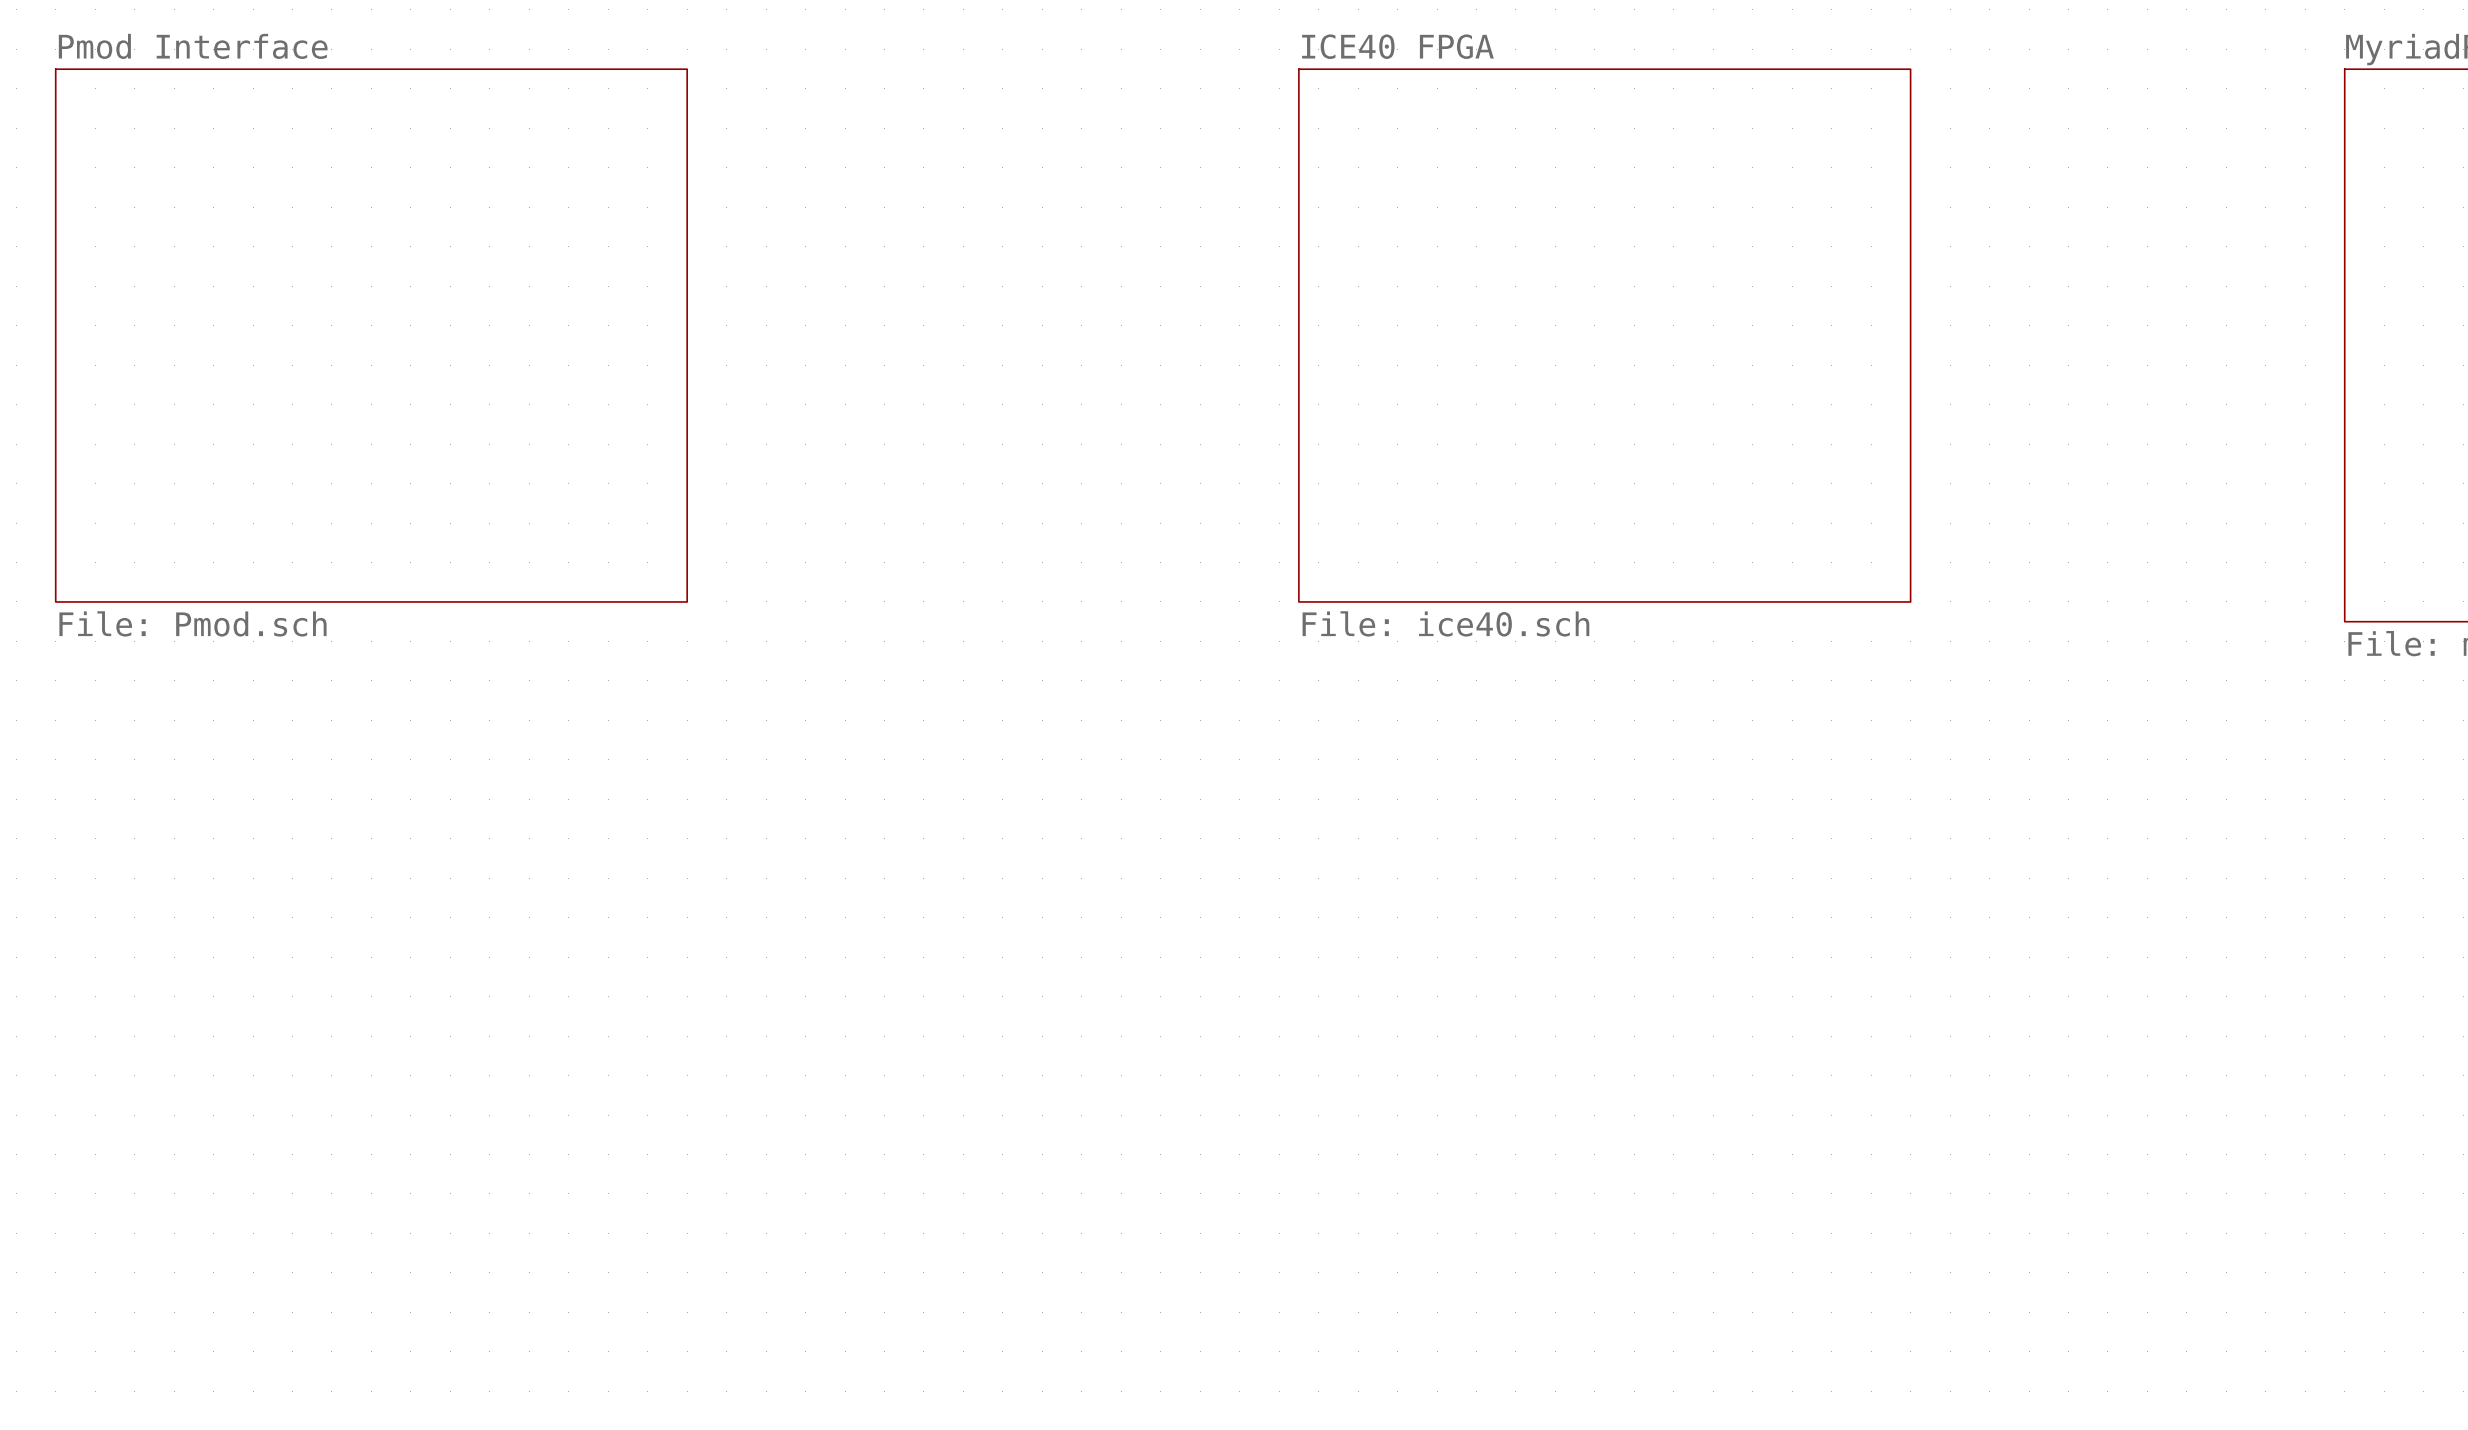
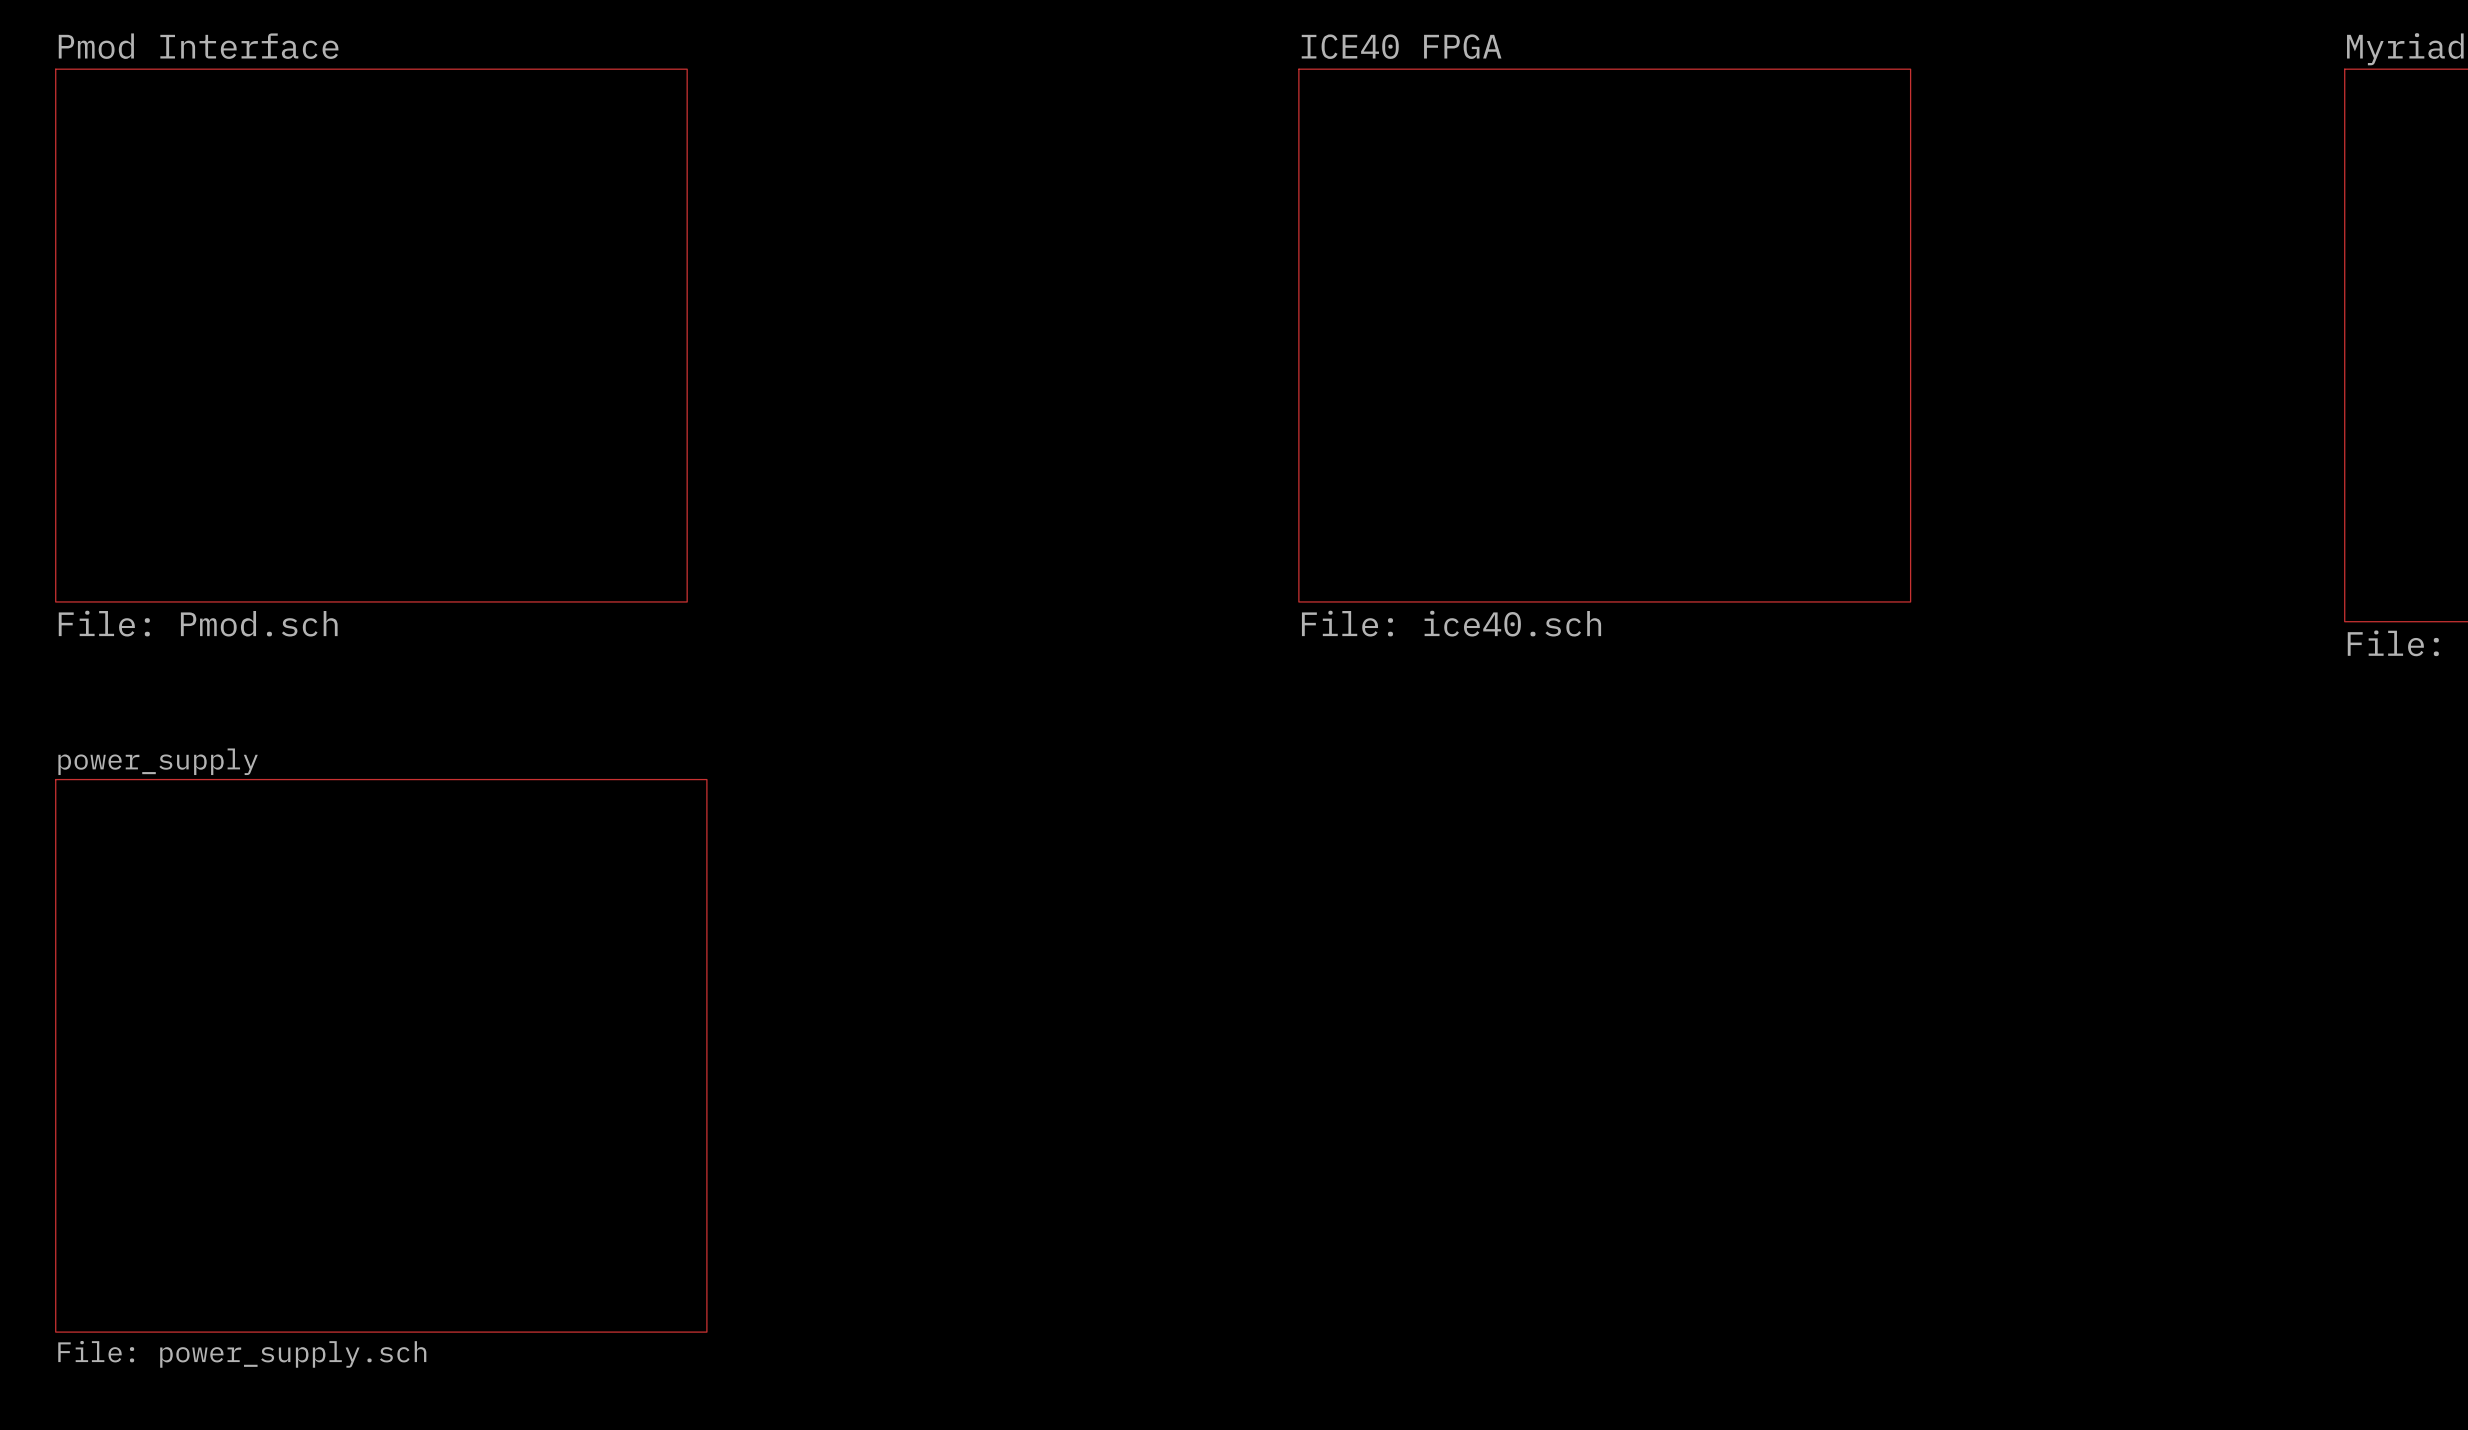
sheet power_supply: none -> File: power_supply.sch (381, 1055)

